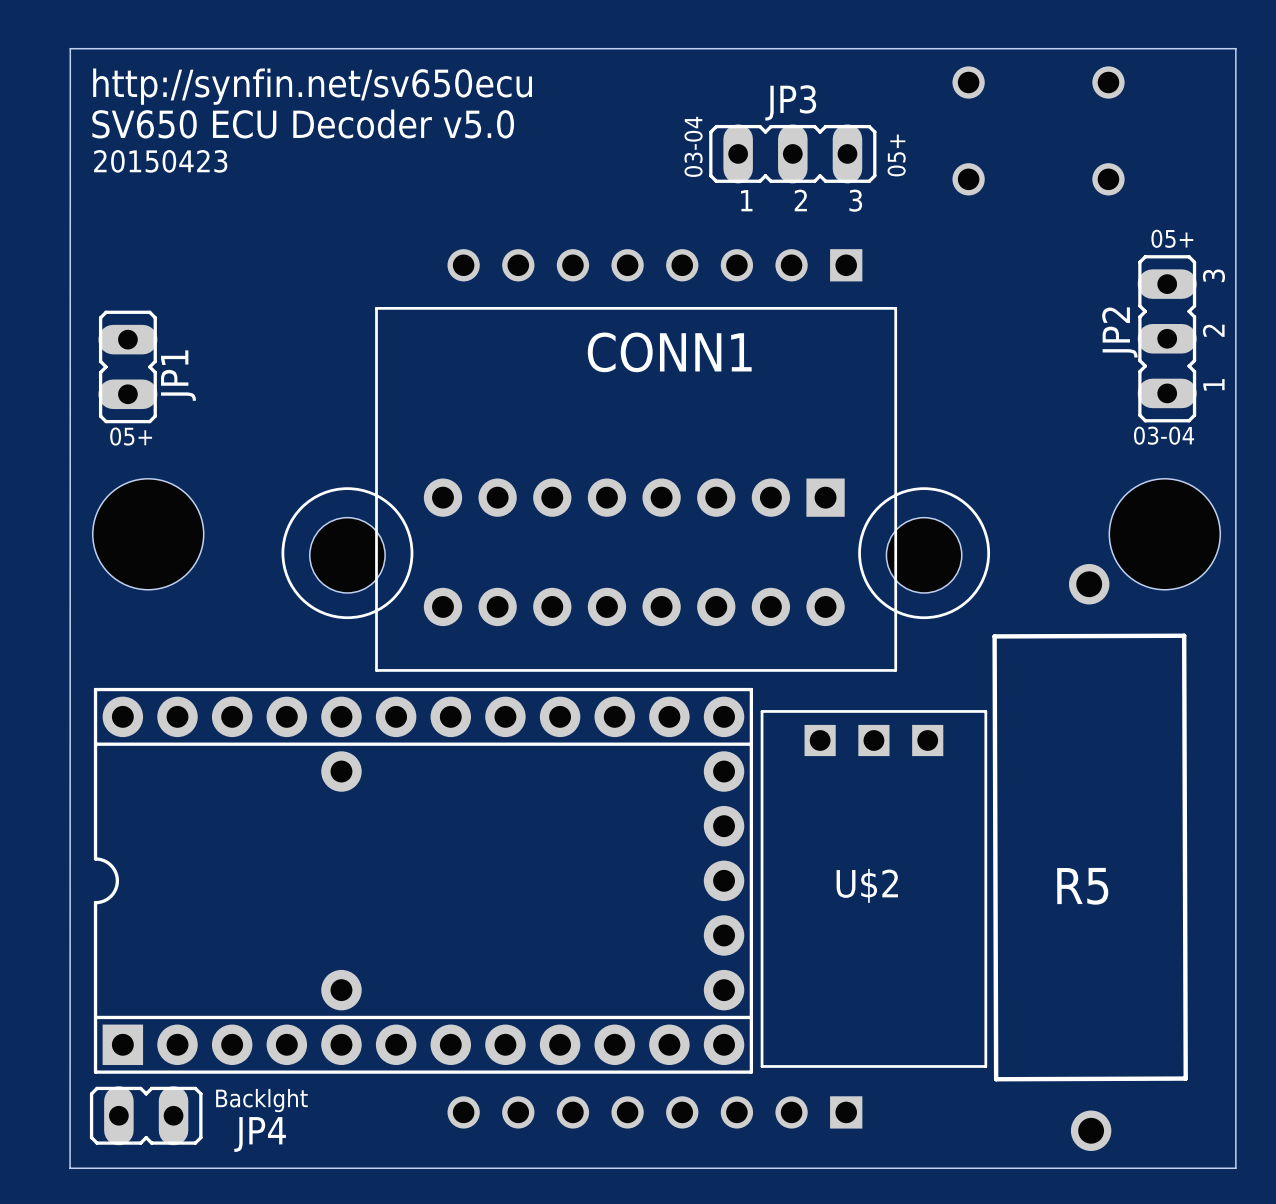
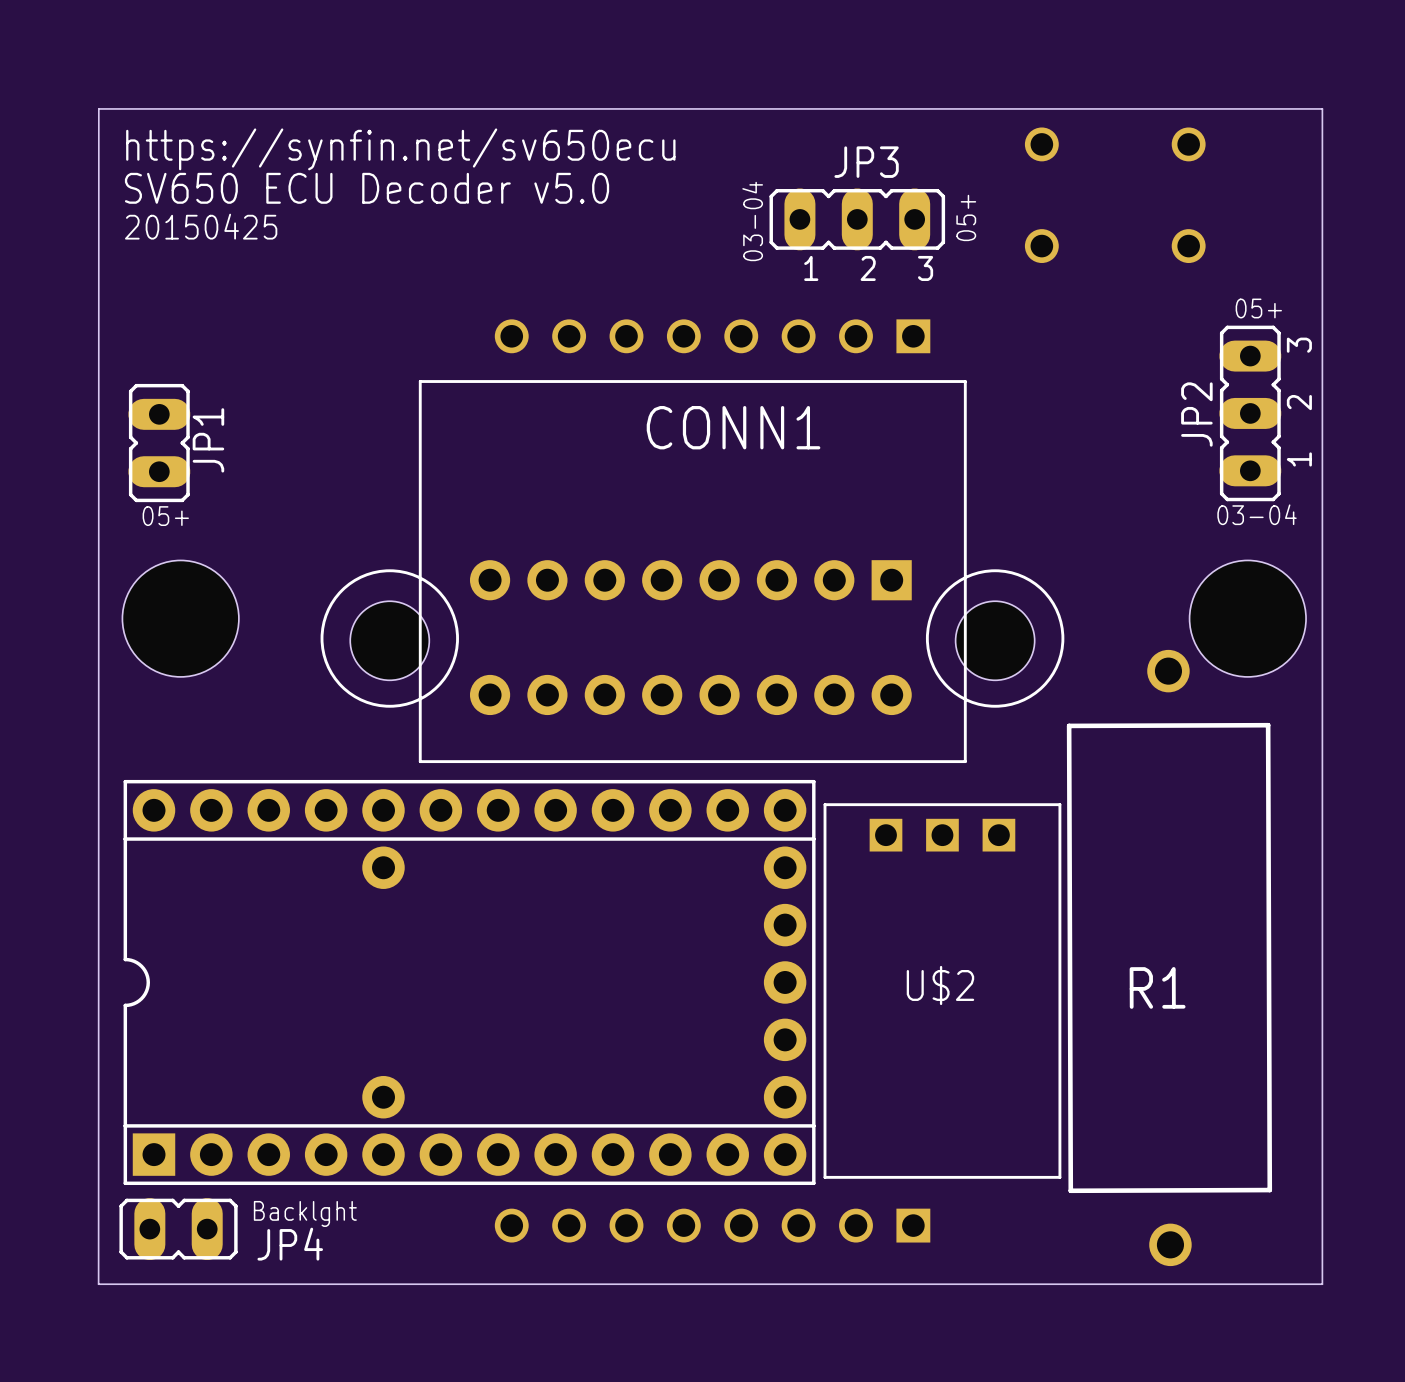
text: http://synfin.net/sv650ecu (312, 86) -> https://synfin.net/sv650ecu (400, 149)
text: 20150423 (160, 161) -> 20150425 (201, 226)
R5 name: R5 (1082, 886) -> R1 (1157, 987)

